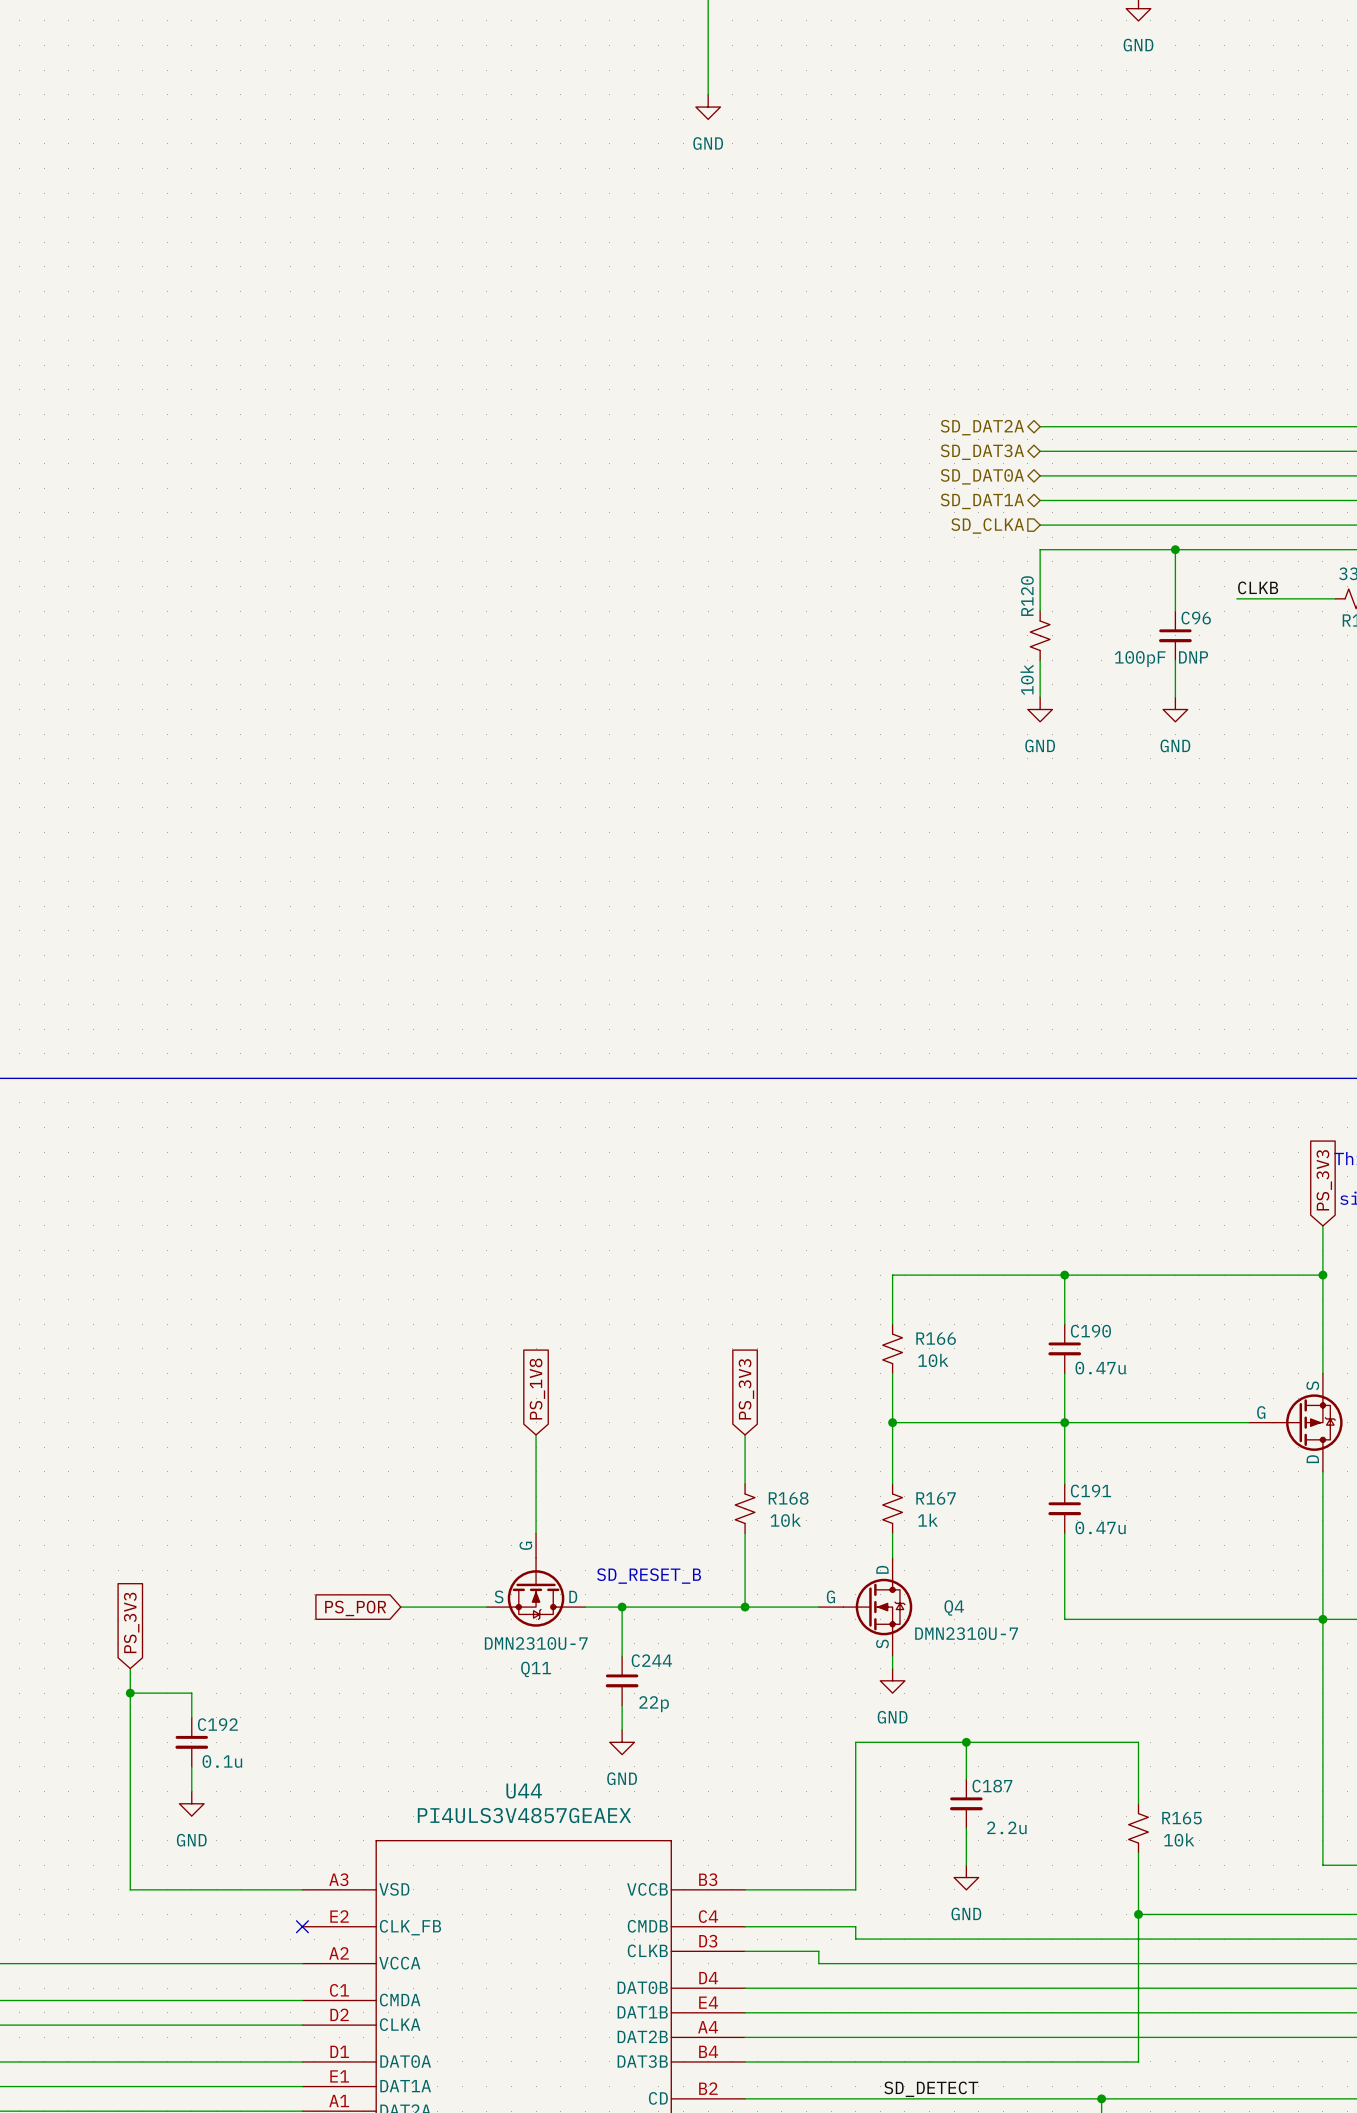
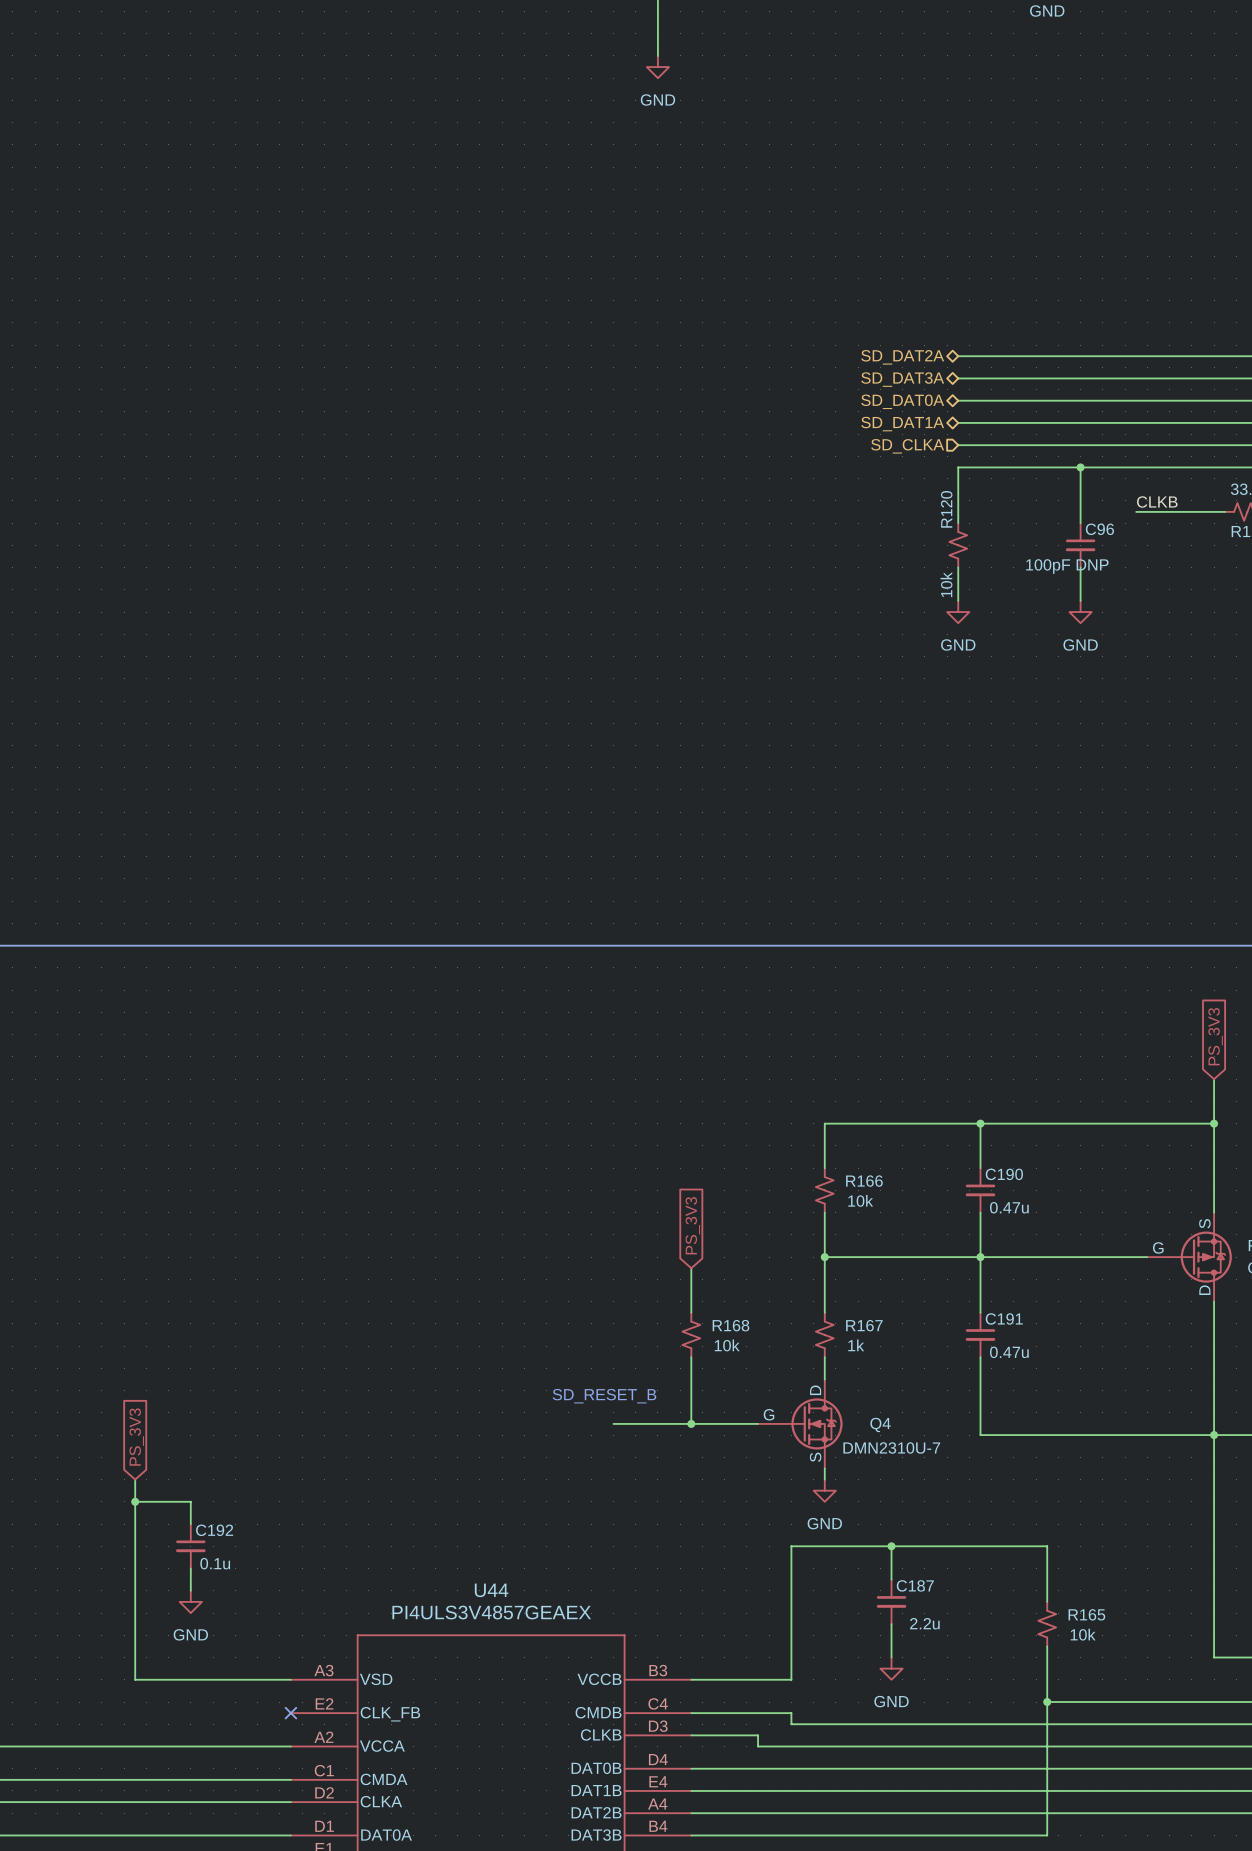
global label: PS_1V8 (537, 1389) -> none
wire: (536, 1434) (536, 1533) -> none
Q11: DMN2310U-7 (536, 1580) -> none
wire: (400, 1607) (486, 1607) -> none
wire: (585, 1607) (658, 1607) -> none
wire: (622, 1607) (622, 1656) -> none
junction: (622, 1607) -> none
global label: PS_POR (355, 1608) -> none
C244: 22p (622, 1680) -> none
wire: (622, 1705) (622, 1730) -> none
power symbol: GND (622, 1742) -> none

